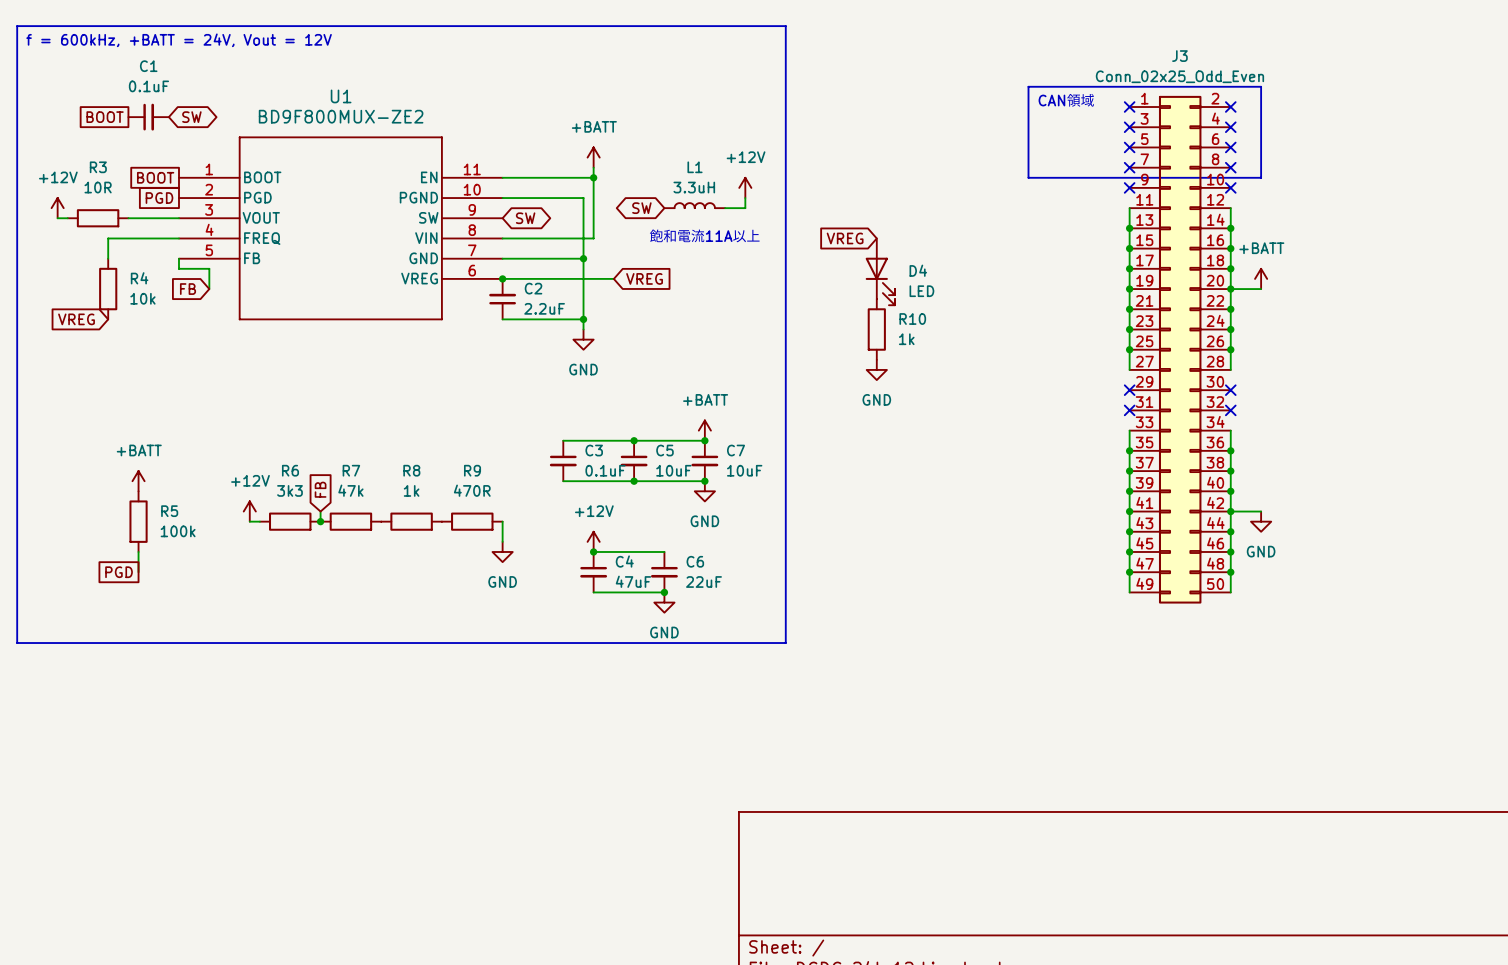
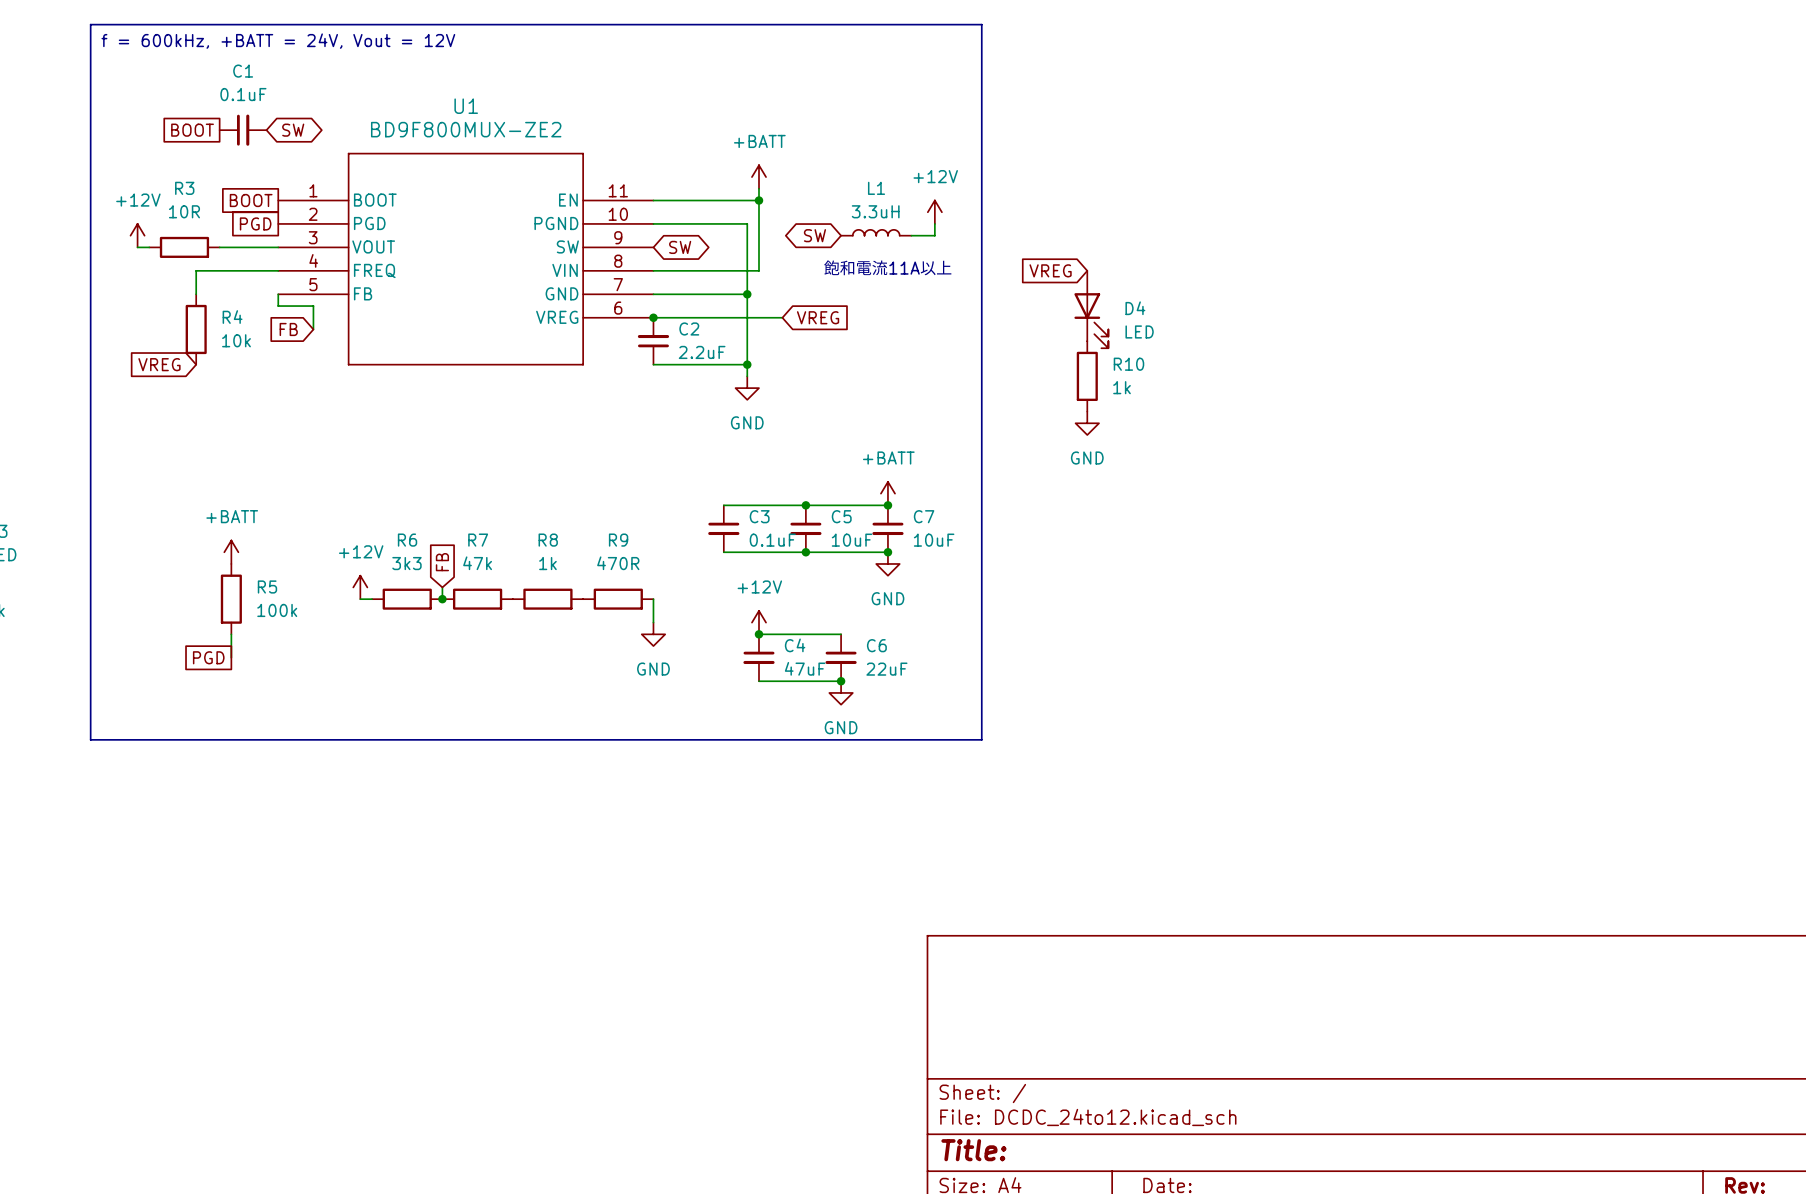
line: (1028, 86) (1261, 86) (1261, 177) (1028, 177) (1028, 86) -> none
text: CAN領域 (1066, 100) -> none
no-connect mark: (1129, 107) -> none
no-connect mark: (1230, 107) -> none
no-connect mark: (1129, 127) -> none
no-connect mark: (1230, 127) -> none
no-connect mark: (1129, 147) -> none
no-connect mark: (1230, 147) -> none
no-connect mark: (1129, 167) -> none
no-connect mark: (1230, 167) -> none
no-connect mark: (1129, 187) -> none
no-connect mark: (1230, 187) -> none
wire: (1129, 208) (1129, 369) -> none
wire: (1230, 208) (1230, 369) -> none
junction: (1129, 228) -> none
junction: (1230, 228) -> none
junction: (1129, 248) -> none
junction: (1230, 248) -> none
junction: (1129, 268) -> none
junction: (1230, 268) -> none
power symbol: +BATT (1261, 278) -> none
junction: (1129, 289) -> none
wire: (1230, 289) (1261, 289) -> none
junction: (1230, 289) -> none
junction: (1129, 309) -> none
junction: (1230, 309) -> none
junction: (1129, 329) -> none
junction: (1230, 329) -> none
junction: (1129, 349) -> none
J3: Conn_02x25_Odd_Even (1180, 349) -> none
junction: (1230, 349) -> none
no-connect mark: (1129, 390) -> none
no-connect mark: (1230, 390) -> none
no-connect mark: (1129, 410) -> none
no-connect mark: (1230, 410) -> none
wire: (1129, 430) (1129, 592) -> none
wire: (1230, 430) (1230, 592) -> none
junction: (1129, 450) -> none
junction: (1230, 450) -> none
junction: (1129, 471) -> none
junction: (1230, 471) -> none
junction: (1129, 491) -> none
junction: (1230, 491) -> none
junction: (1129, 511) -> none
wire: (1230, 511) (1261, 511) -> none
junction: (1230, 511) -> none
power symbol: GND (1261, 521) -> none
junction: (1129, 531) -> none
junction: (1230, 531) -> none
junction: (1129, 551) -> none
junction: (1230, 551) -> none
junction: (1129, 572) -> none
junction: (1230, 572) -> none

